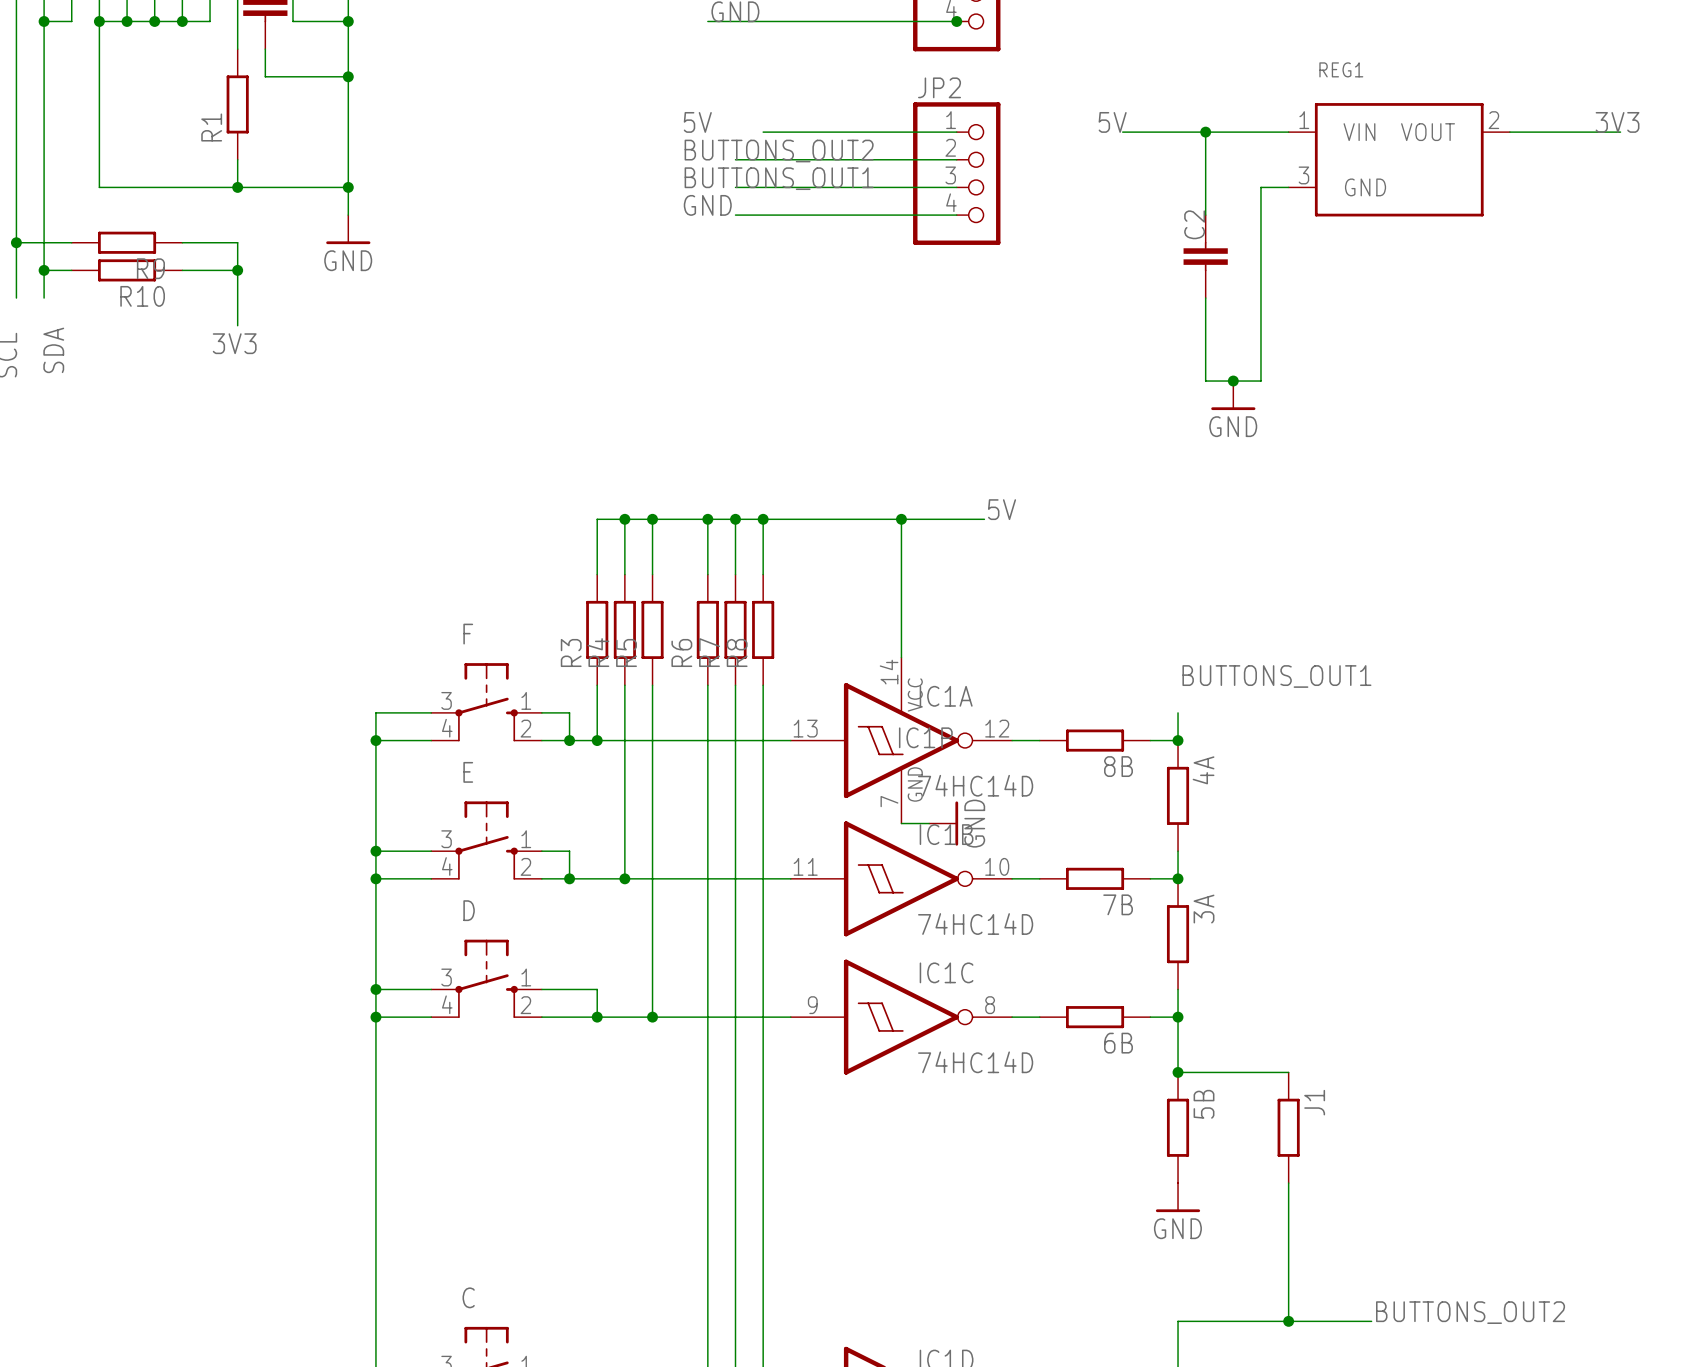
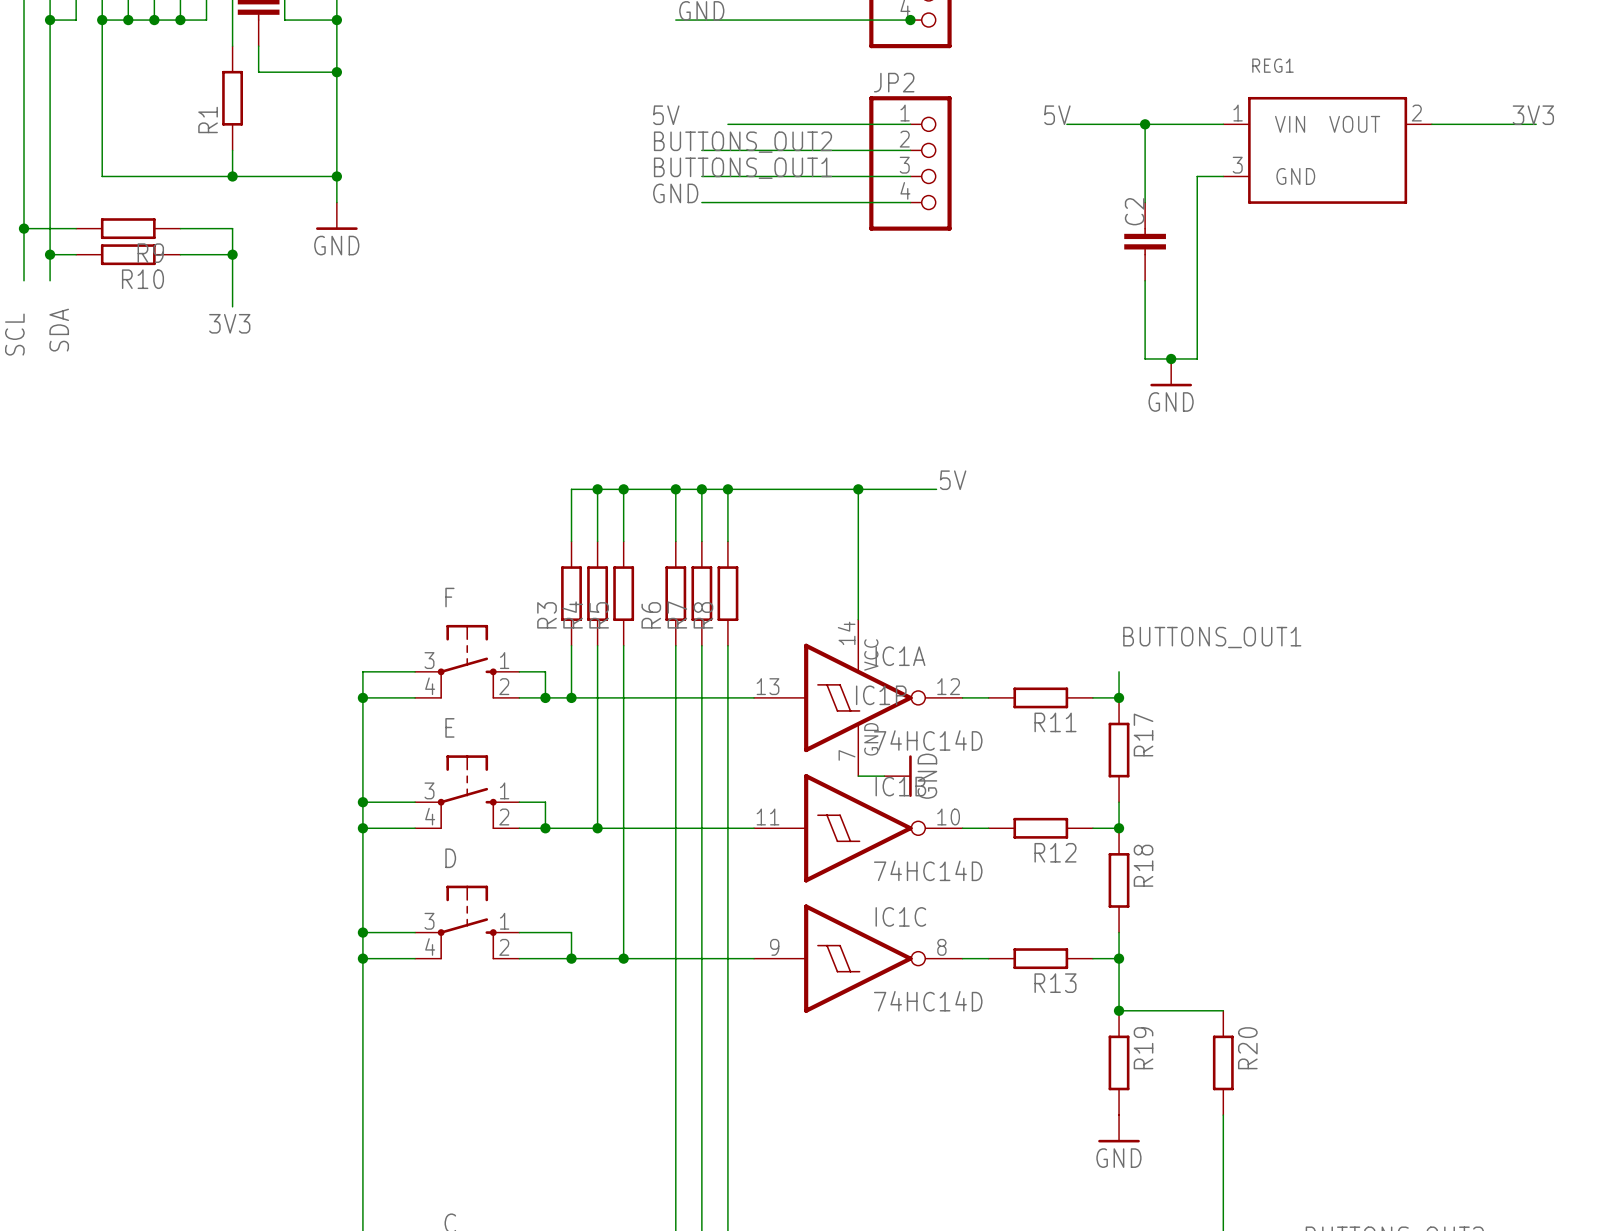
8B name: 8B (1118, 766) -> R11 (1055, 722)
4A name: 4A (1203, 770) -> R17 (1143, 734)
7B name: 7B (1118, 904) -> R12 (1055, 852)
3A name: 3A (1204, 909) -> R18 (1143, 865)
6B name: 6B (1118, 1043) -> R13 (1055, 983)
J1 name: J1 (1314, 1102) -> R20 (1247, 1048)
5B name: 5B (1204, 1104) -> R19 (1143, 1048)

